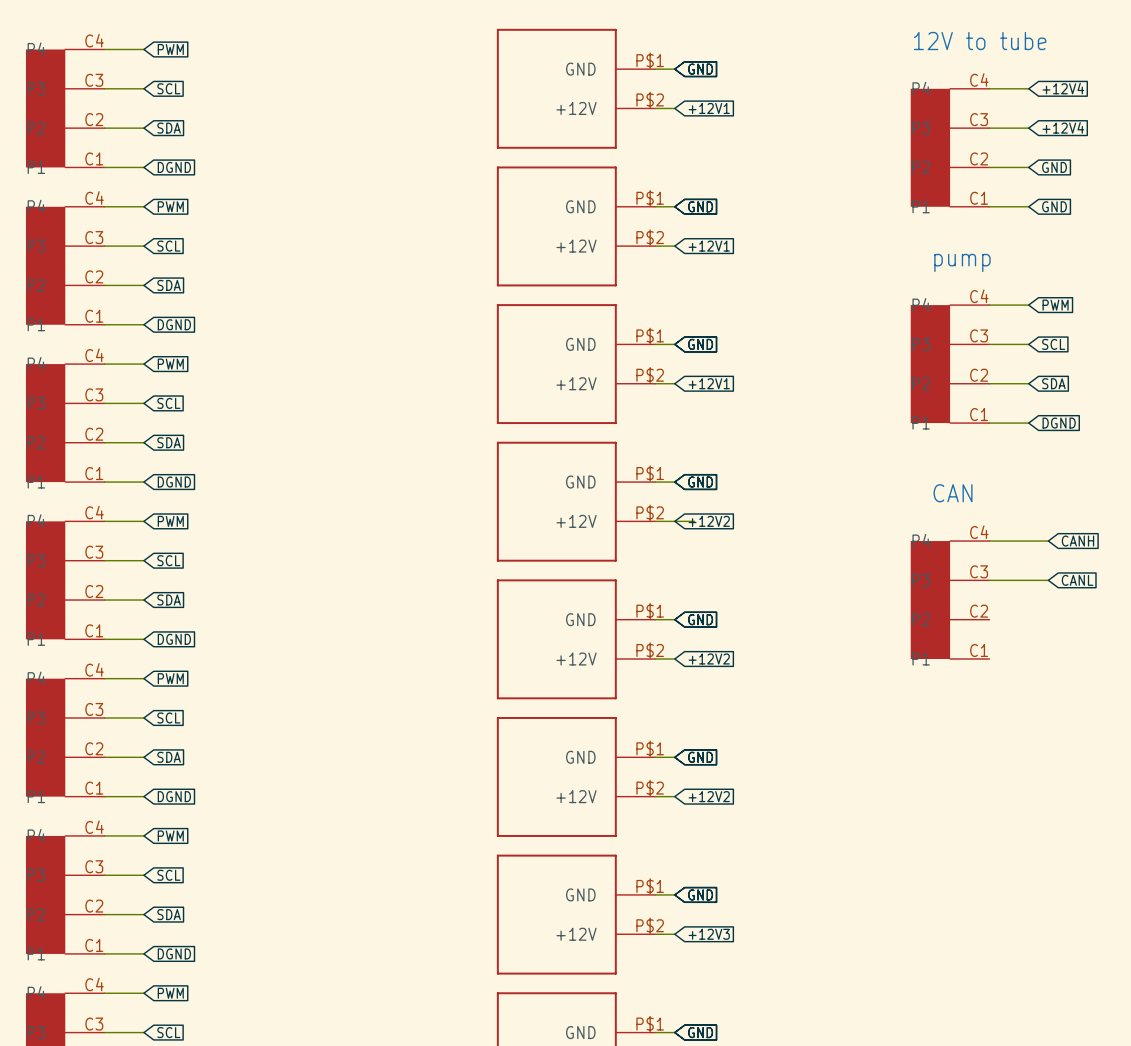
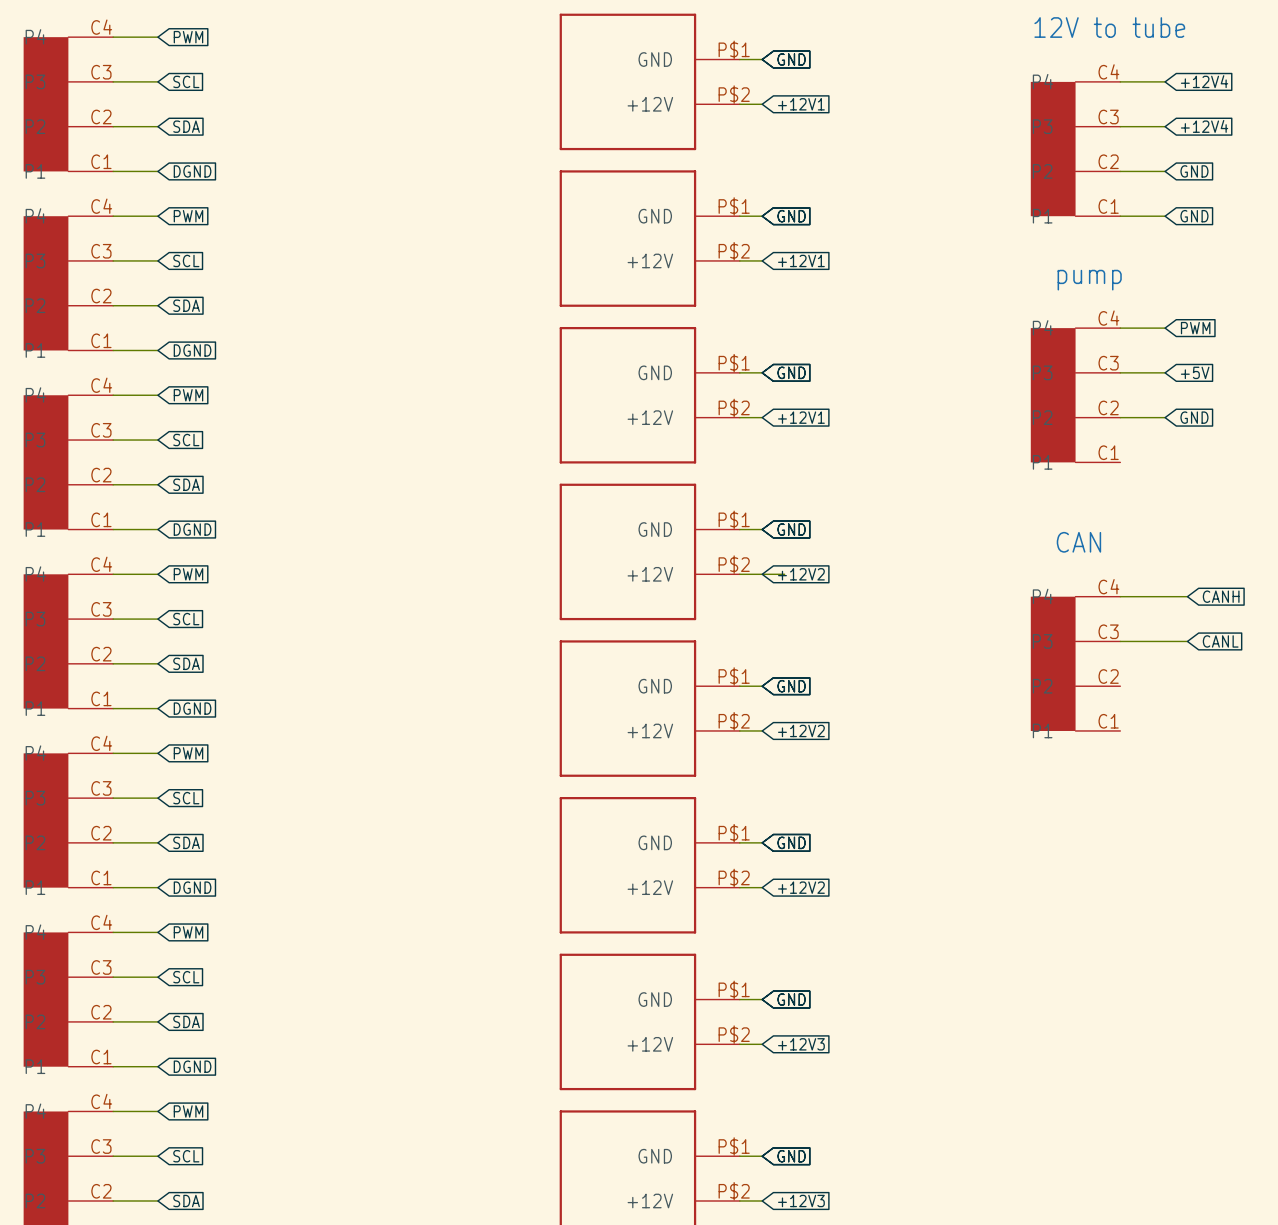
global label: SCL (1053, 344) -> +5V (1195, 372)
global label: SDA (1053, 383) -> GND (1194, 417)
wire: (989, 423) (1028, 423) -> none
global label: DGND (1059, 423) -> none

